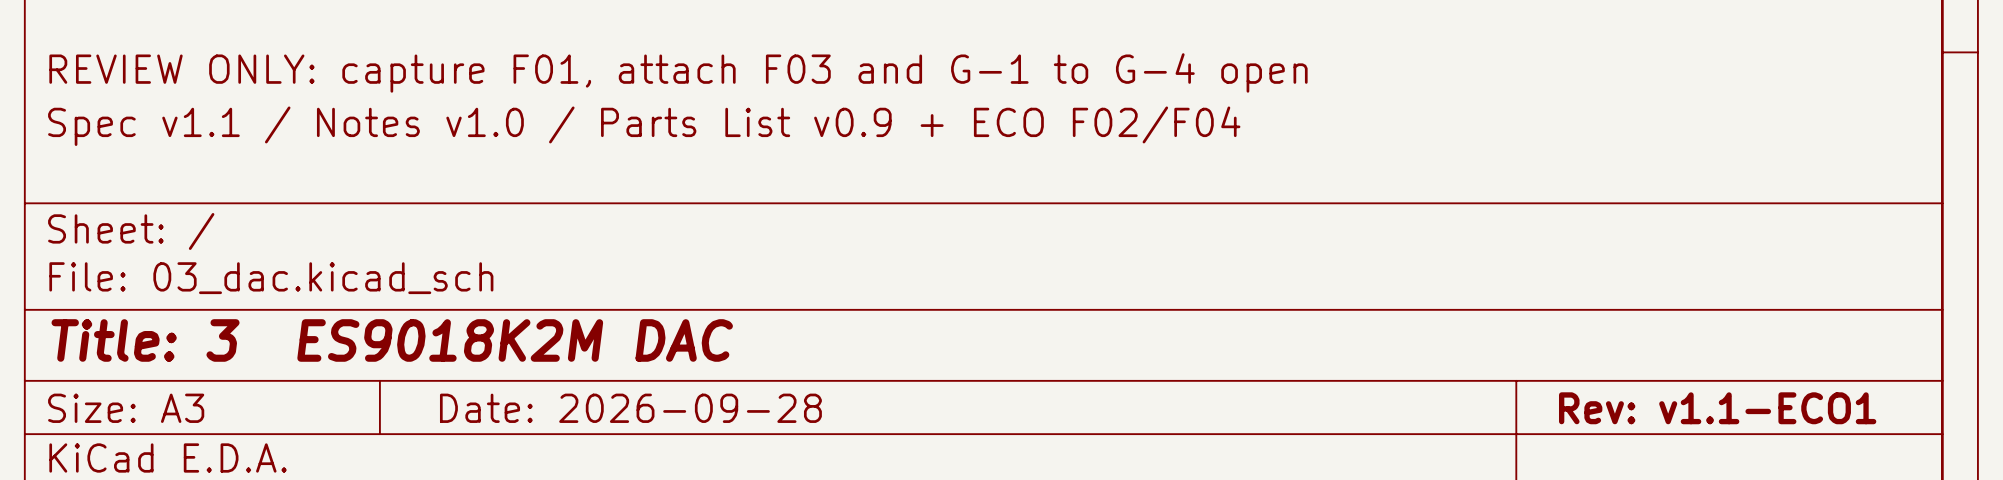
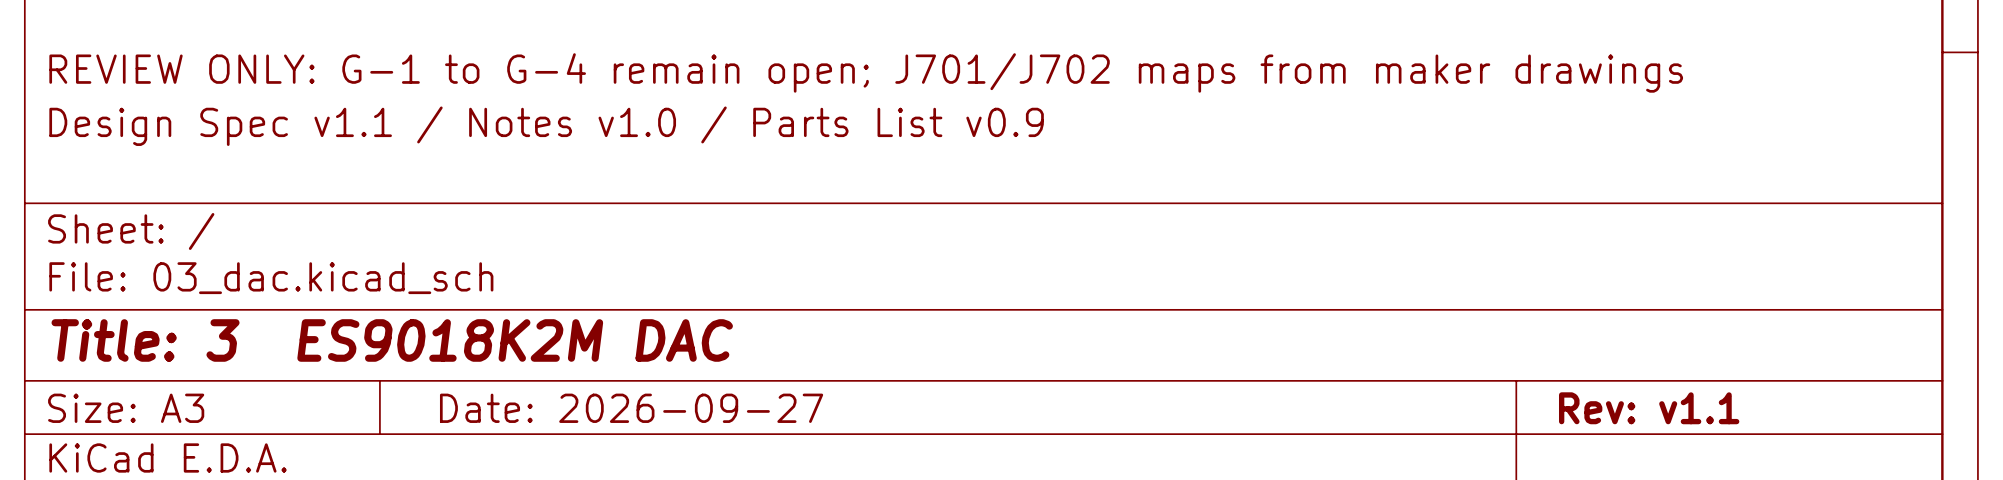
title block: REVIEW ONLY: capture F01, attach F03 and G-1 to G-4 open (678, 72) -> REVIEW ONLY: G-1 to G-4 remain open; J701/J702 maps from maker drawings (866, 72)
title block: Spec v1.1 / Notes v1.0 / Parts List v0.9 + ECO F02/F04 (644, 126) -> Design Spec v1.1 / Notes v1.0 / Parts List v0.9 (546, 126)
title block: Date: 2026-09-28 (630, 408) -> Date: 2026-09-27 (631, 408)
title block: Rev: v1.1-ECO1 (1717, 408) -> Rev: v1.1 (1649, 408)

